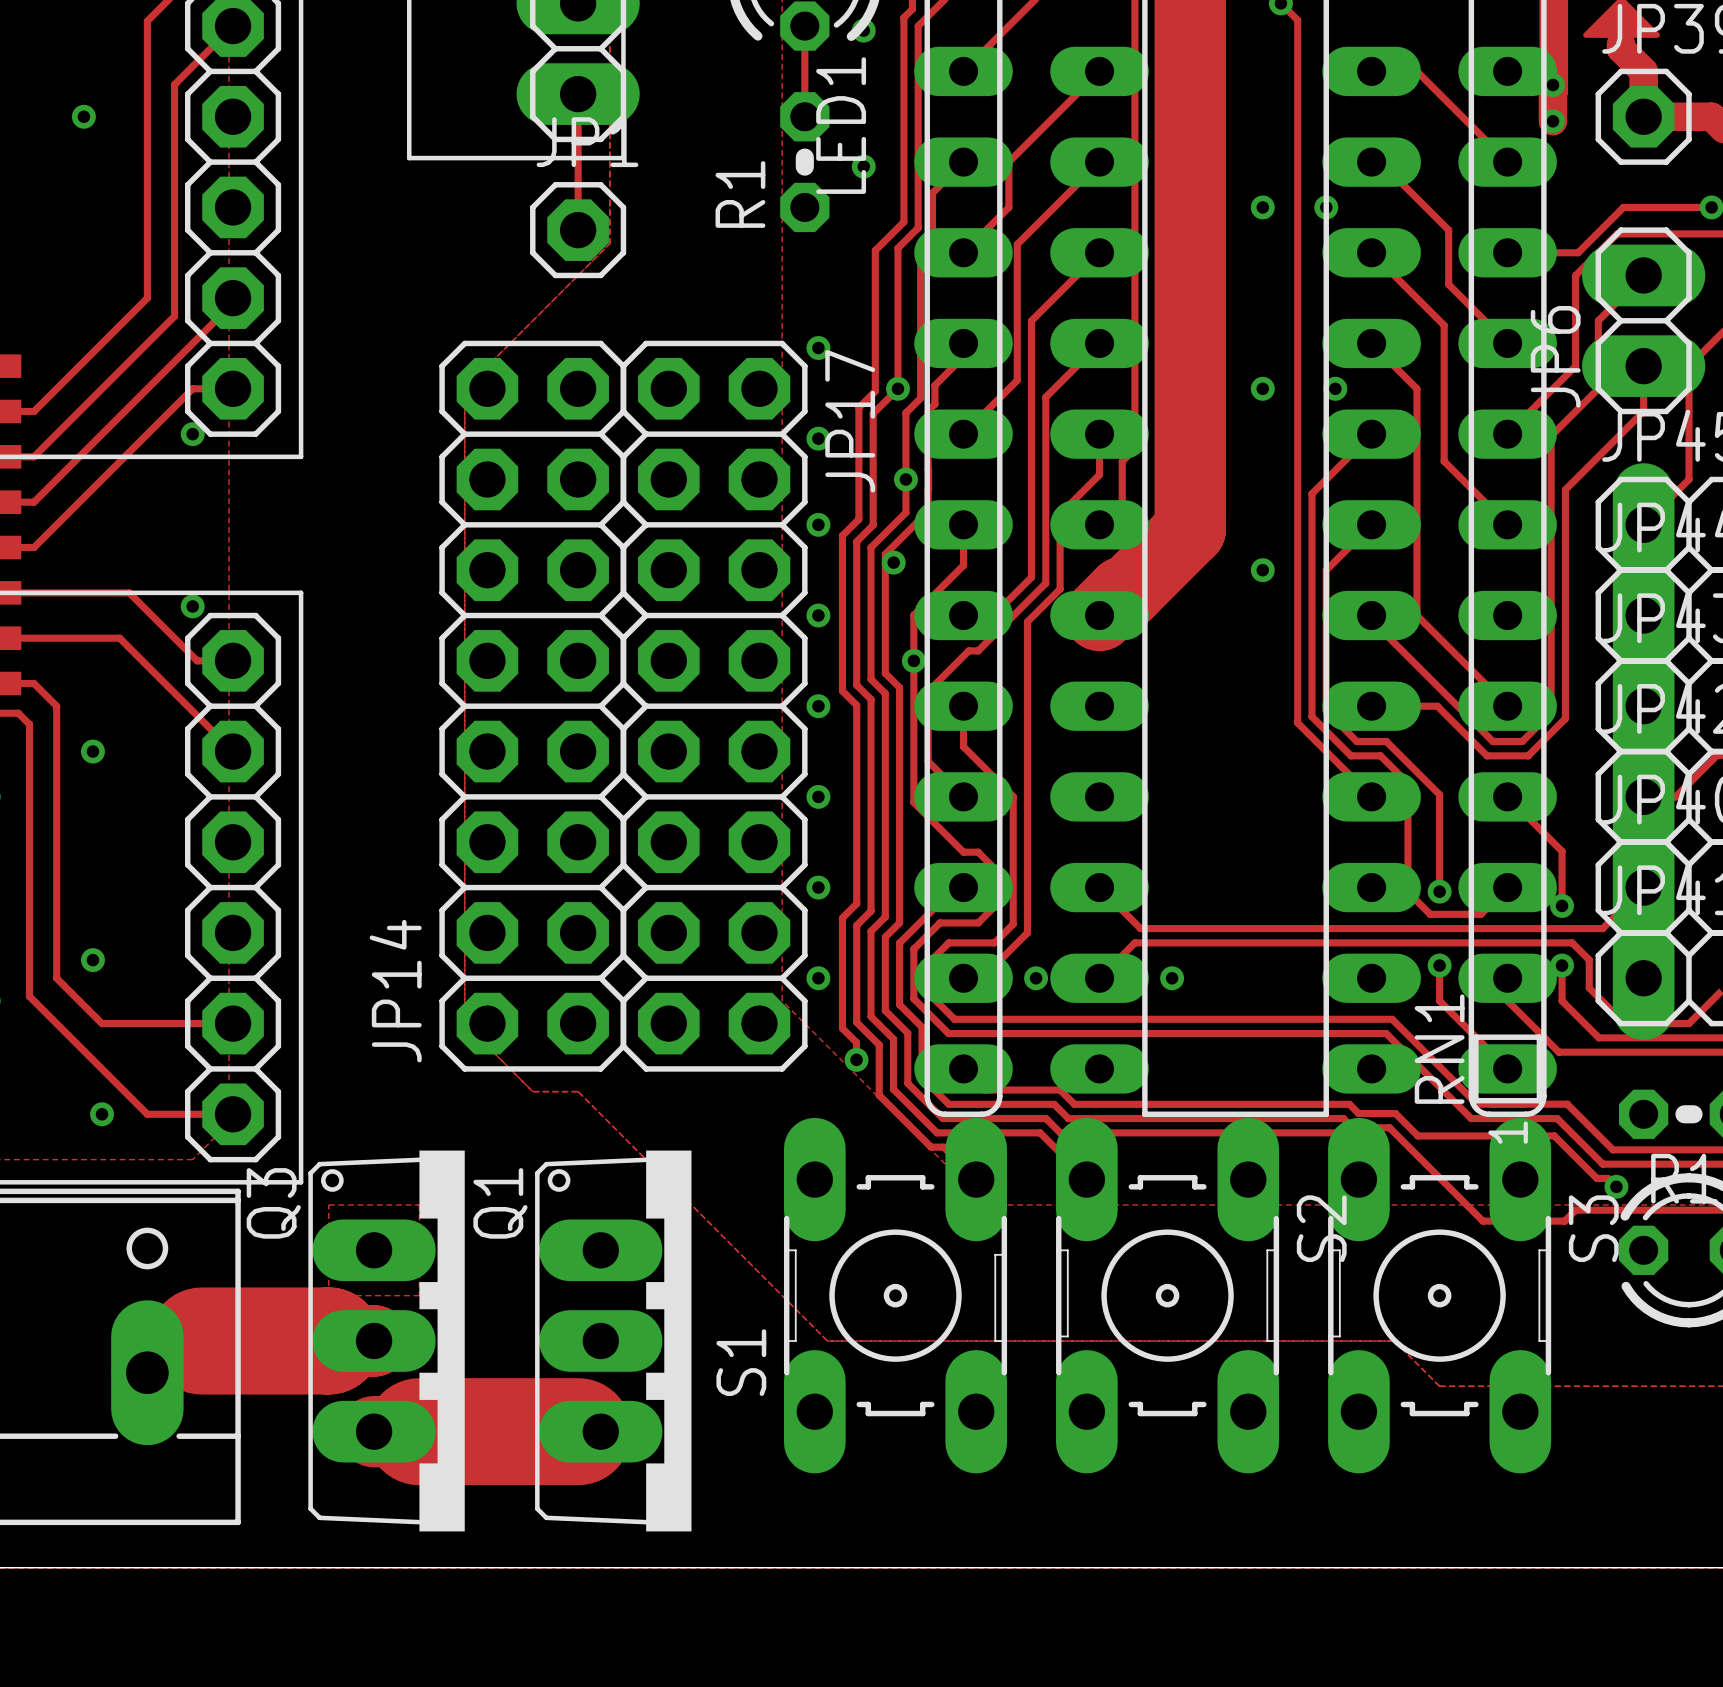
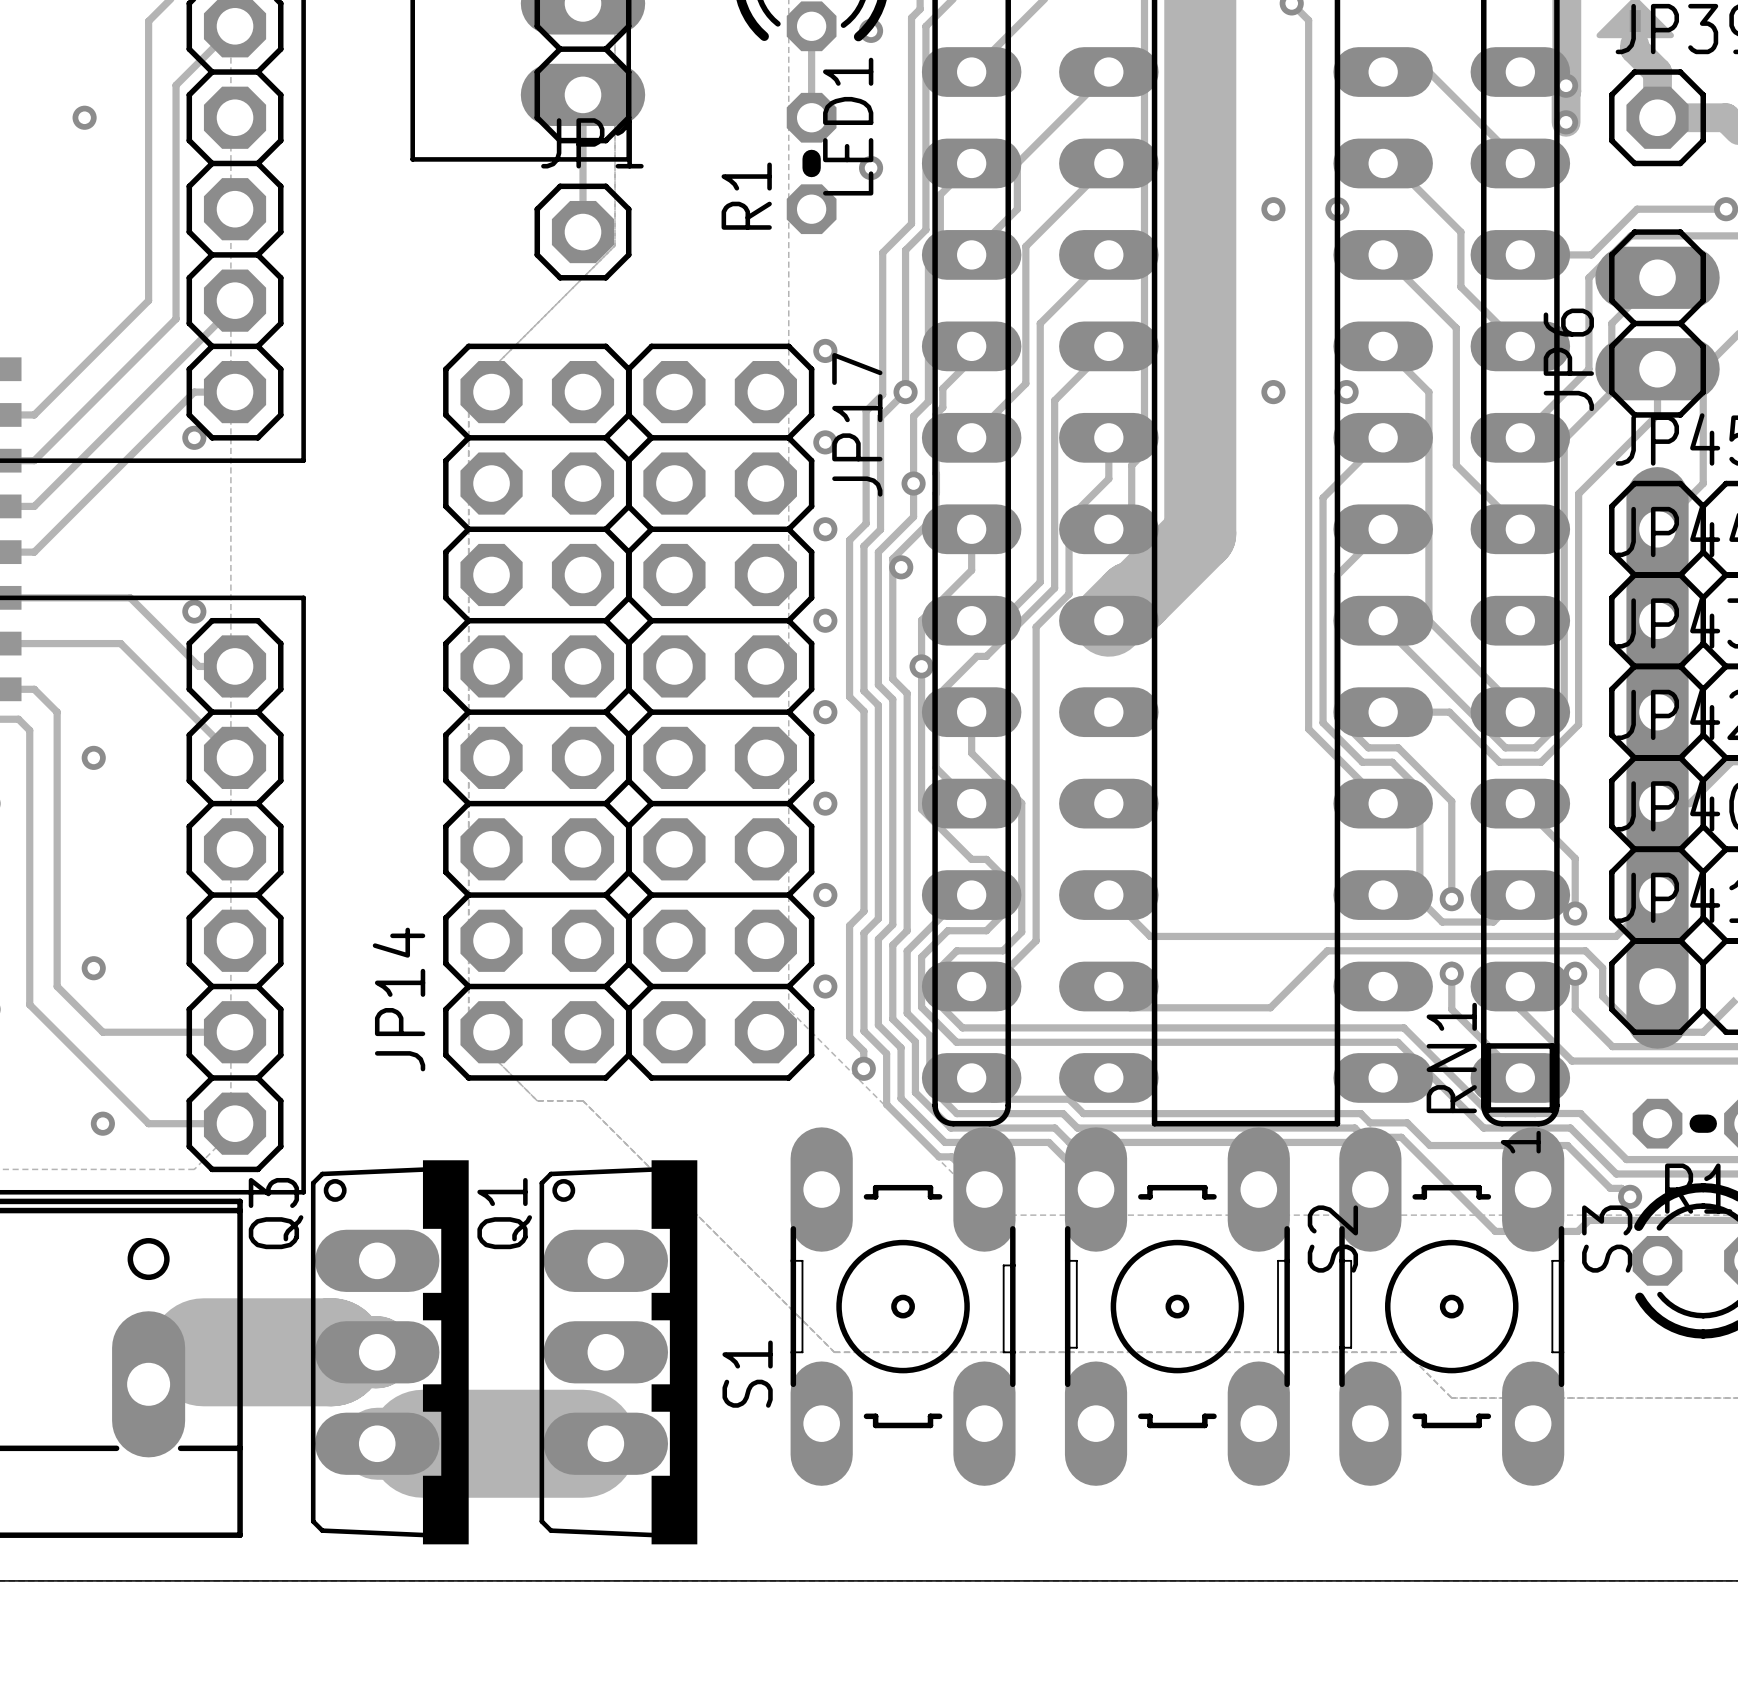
via: (1262, 570) -> none
track: (1316, 942) (1134, 942) (1099, 978) -> (1327, 950) (1270, 1007) (1130, 1007) (1108, 986)
via: (1036, 978) -> none
via: (1172, 978) -> none
zone outline: (328, 1204) (419, 1204) (419, 1295) (328, 1295) (328, 1204) -> none

